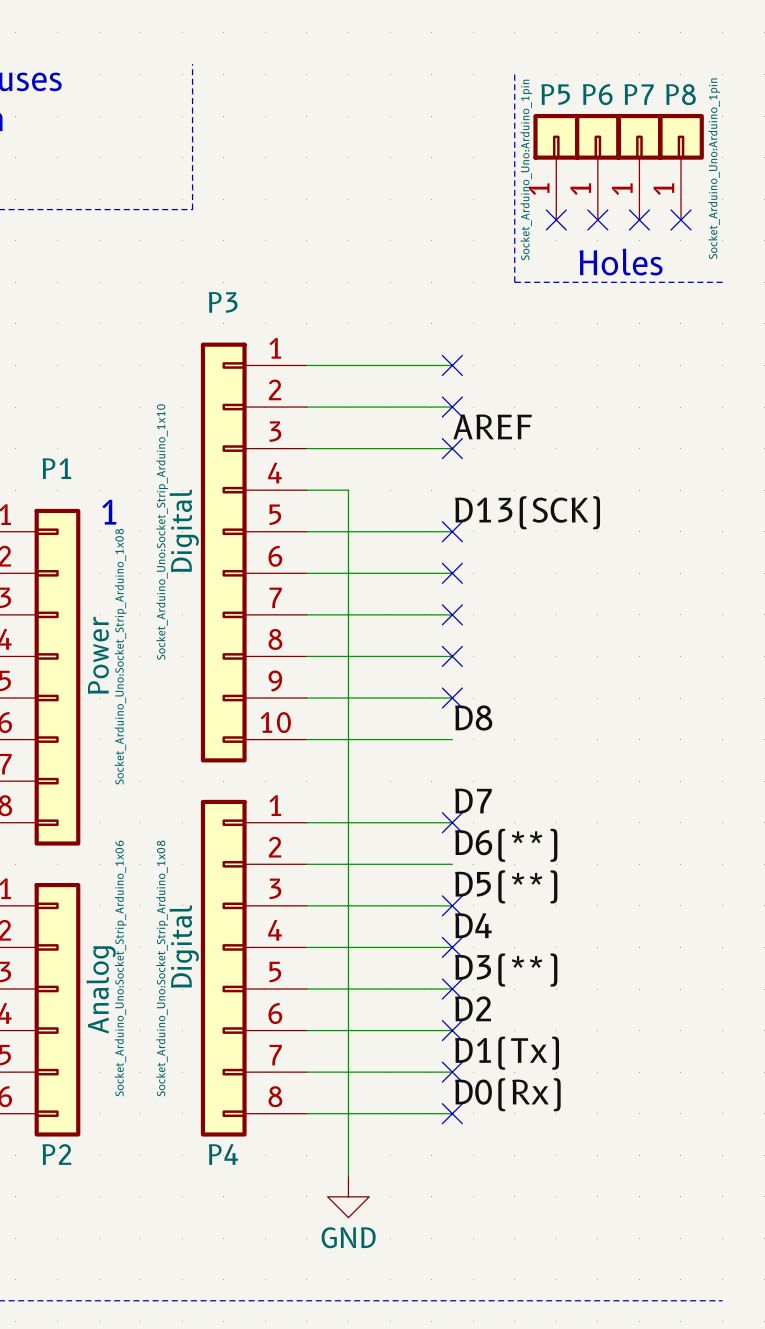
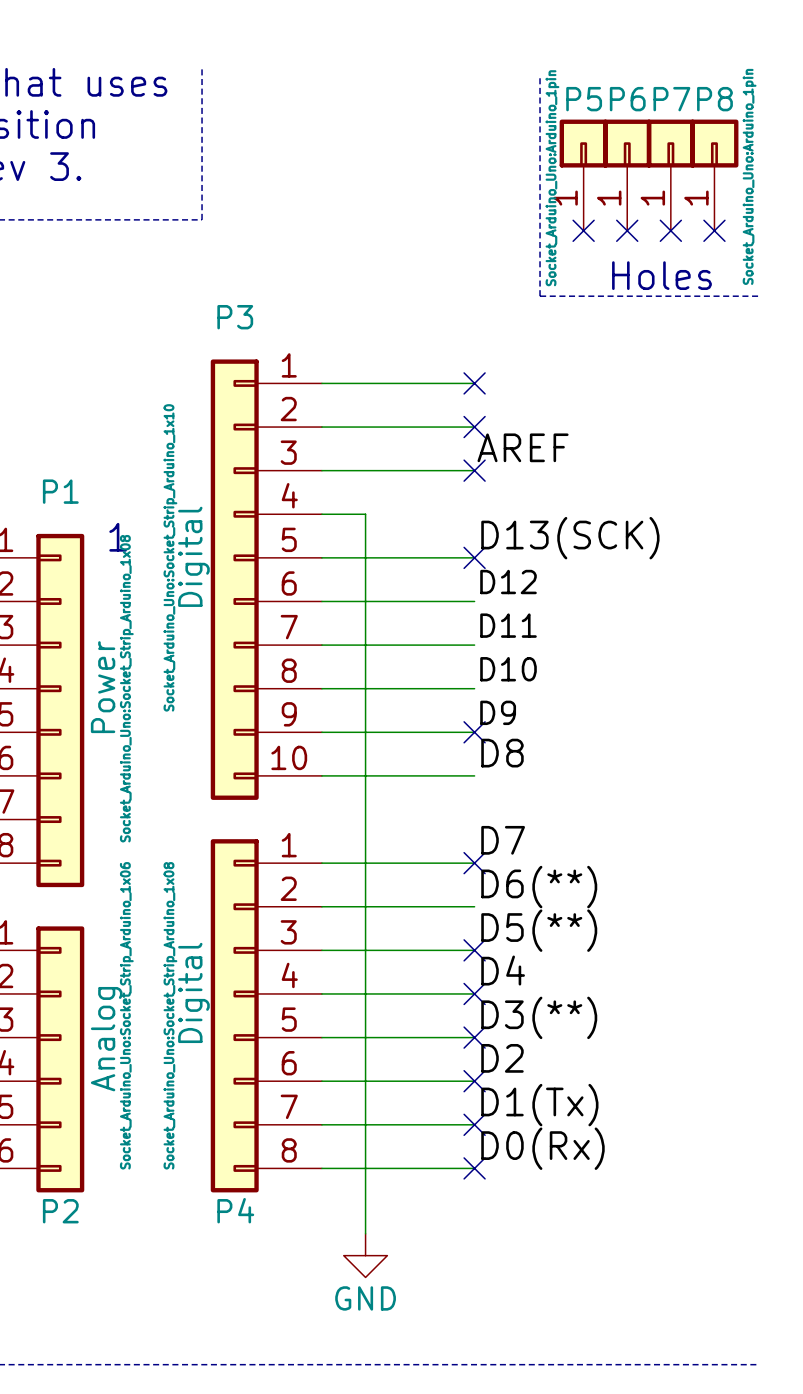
label: none -> D12 (508, 582)
no-connect mark: (452, 573) -> none
label: none -> D11 (508, 625)
no-connect mark: (452, 614) -> none
label: none -> D10 (508, 669)
no-connect mark: (452, 656) -> none
label: none -> D9 (498, 712)

